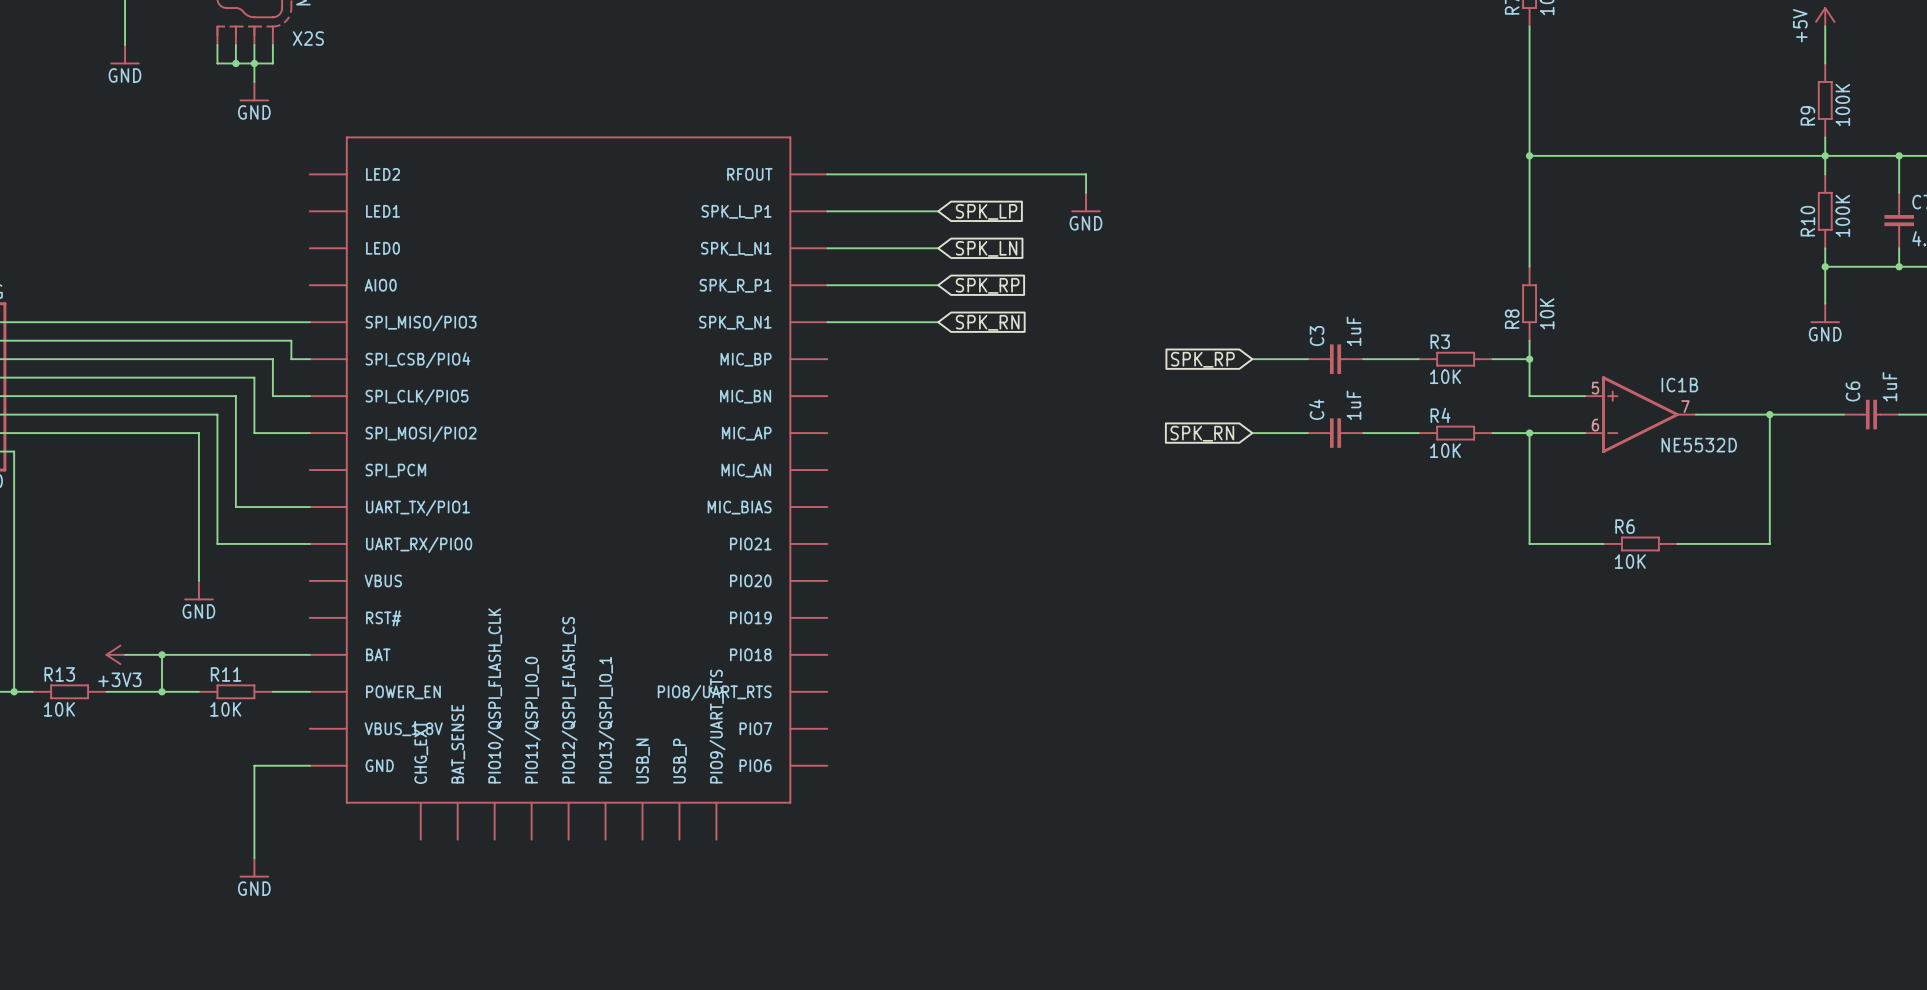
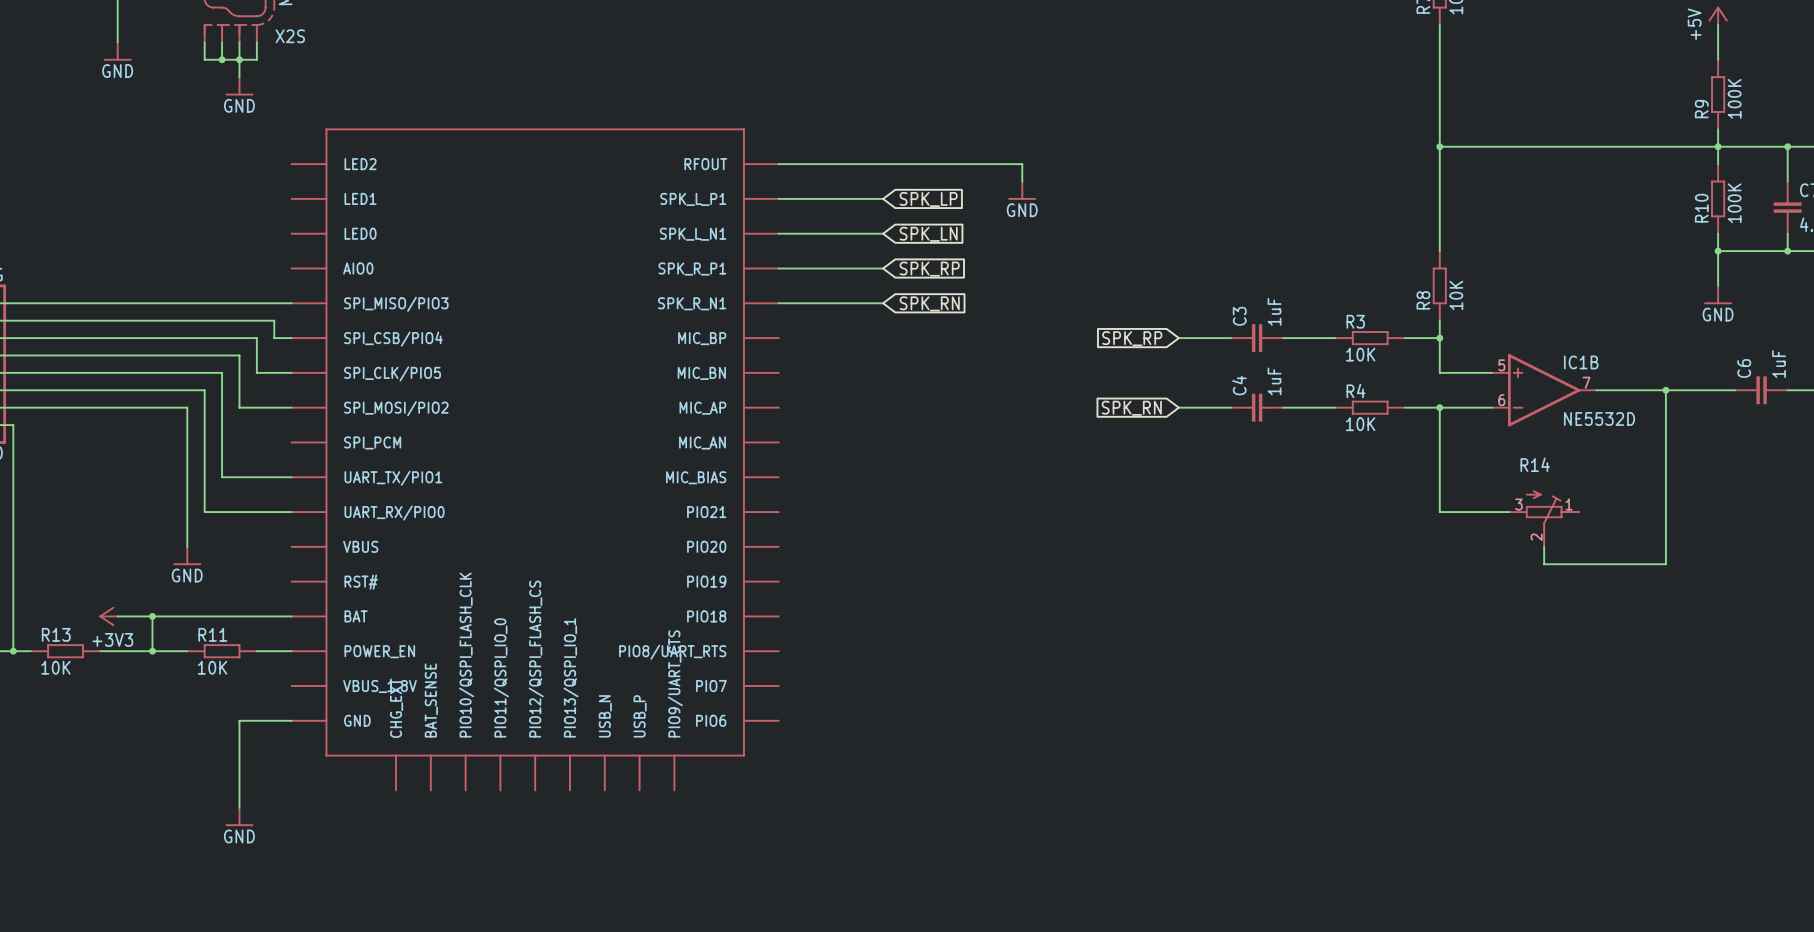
R6: 10K (1640, 543) -> none
wire: (1677, 543) (1769, 543) -> (1544, 546) (1544, 564) (1665, 564) (1665, 512)
R14: none -> (1544, 518)

